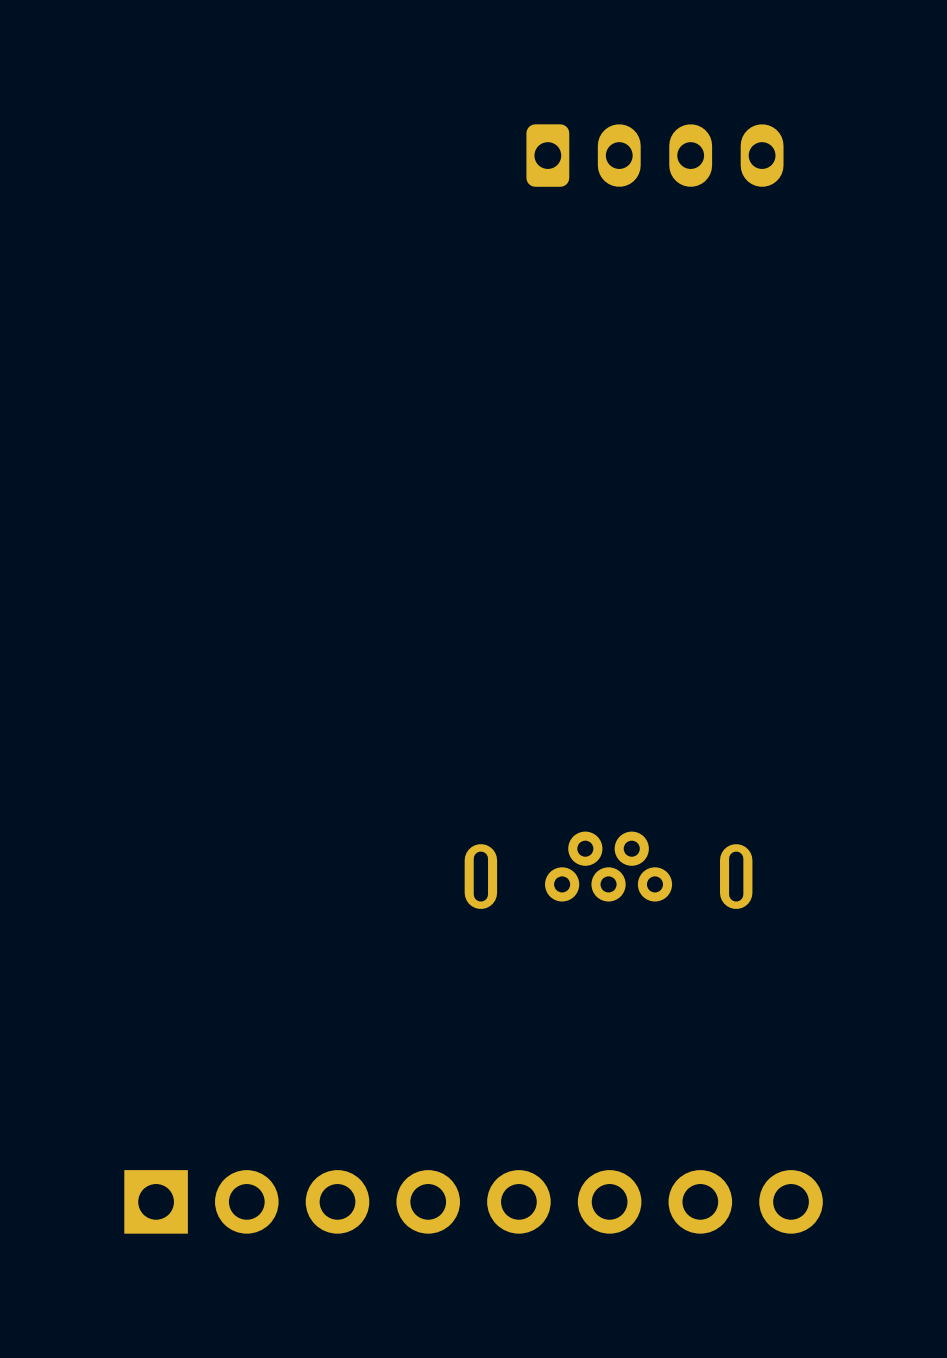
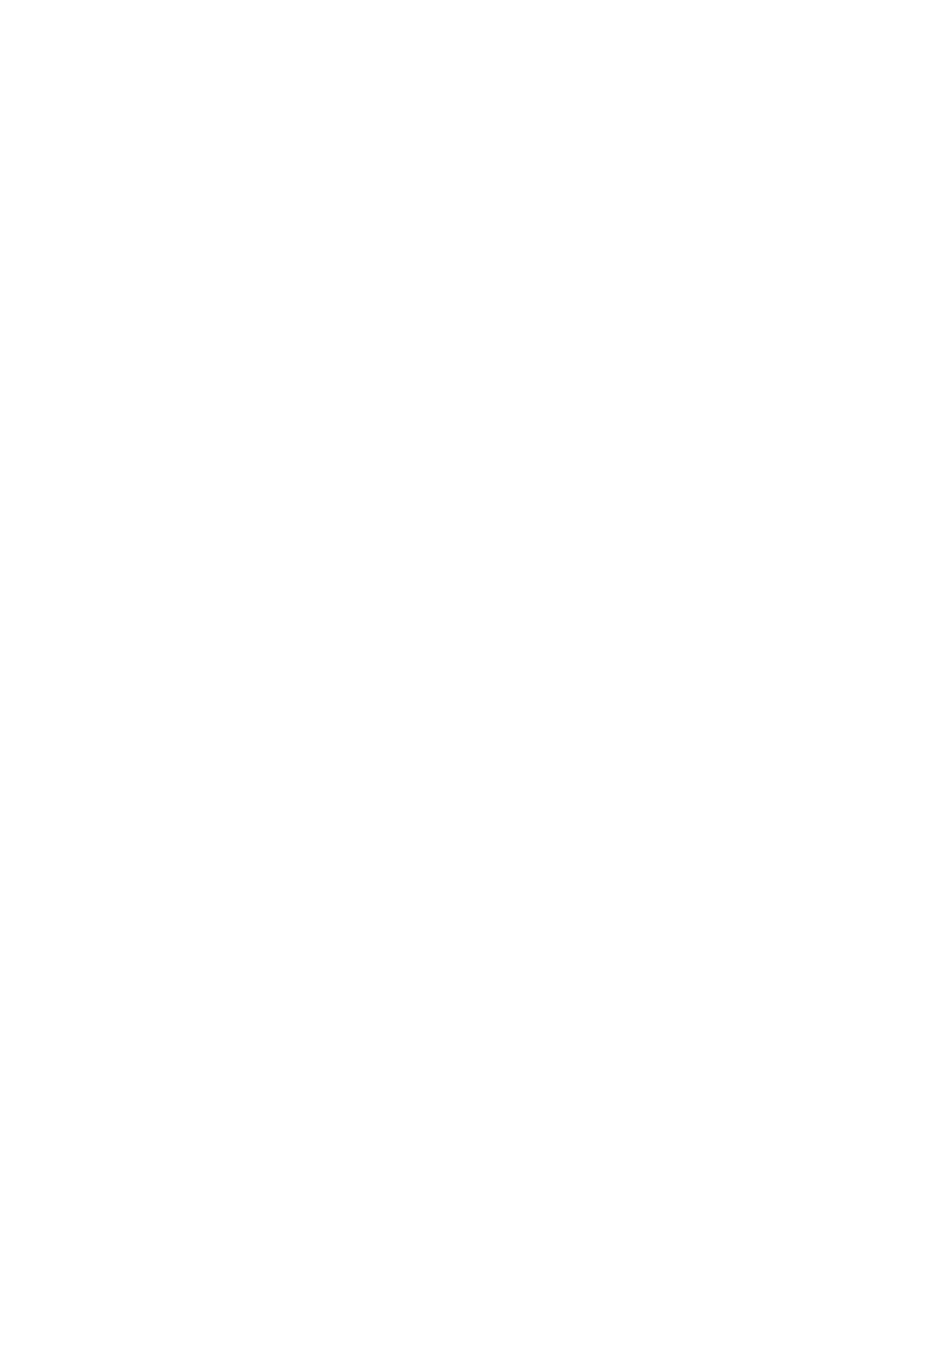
part: (654, 155) -> none
part: (608, 870) -> none
part: (473, 1201) -> none

